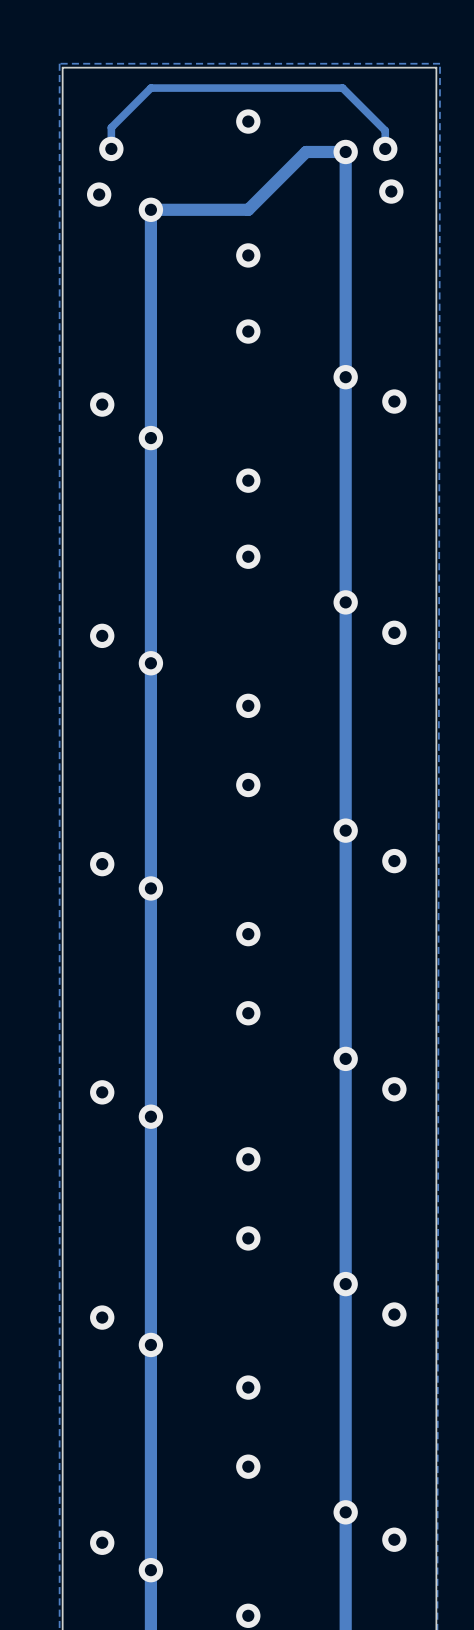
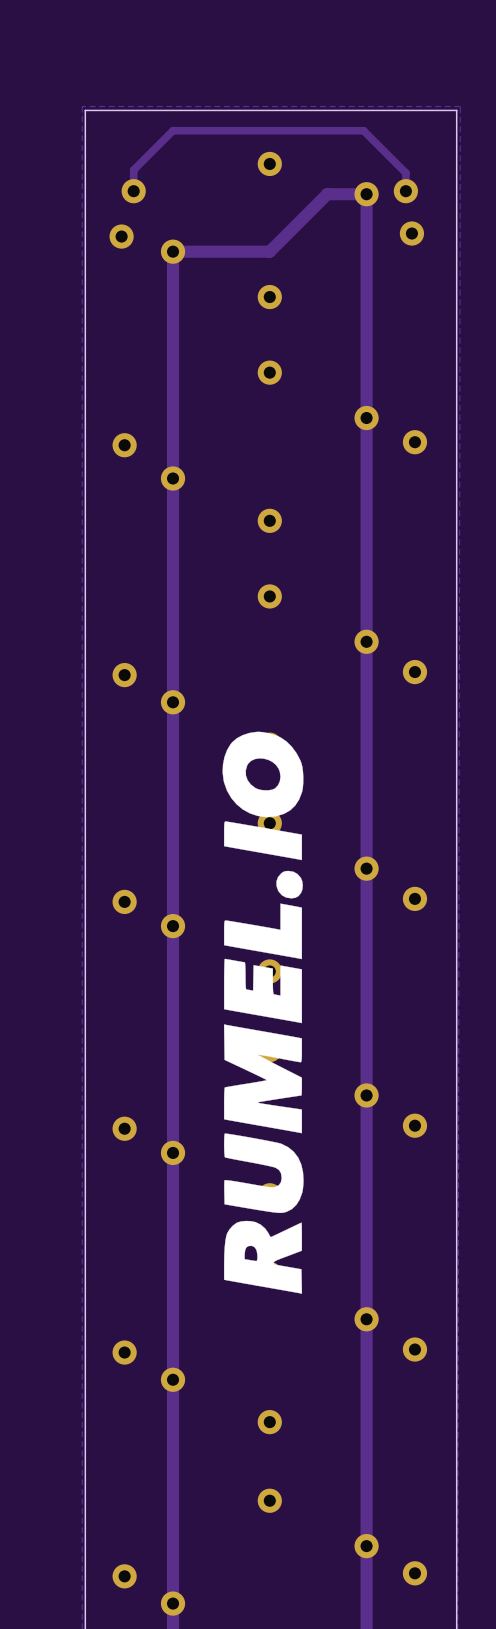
drawing: none -> [222, 731, 304, 1294]

